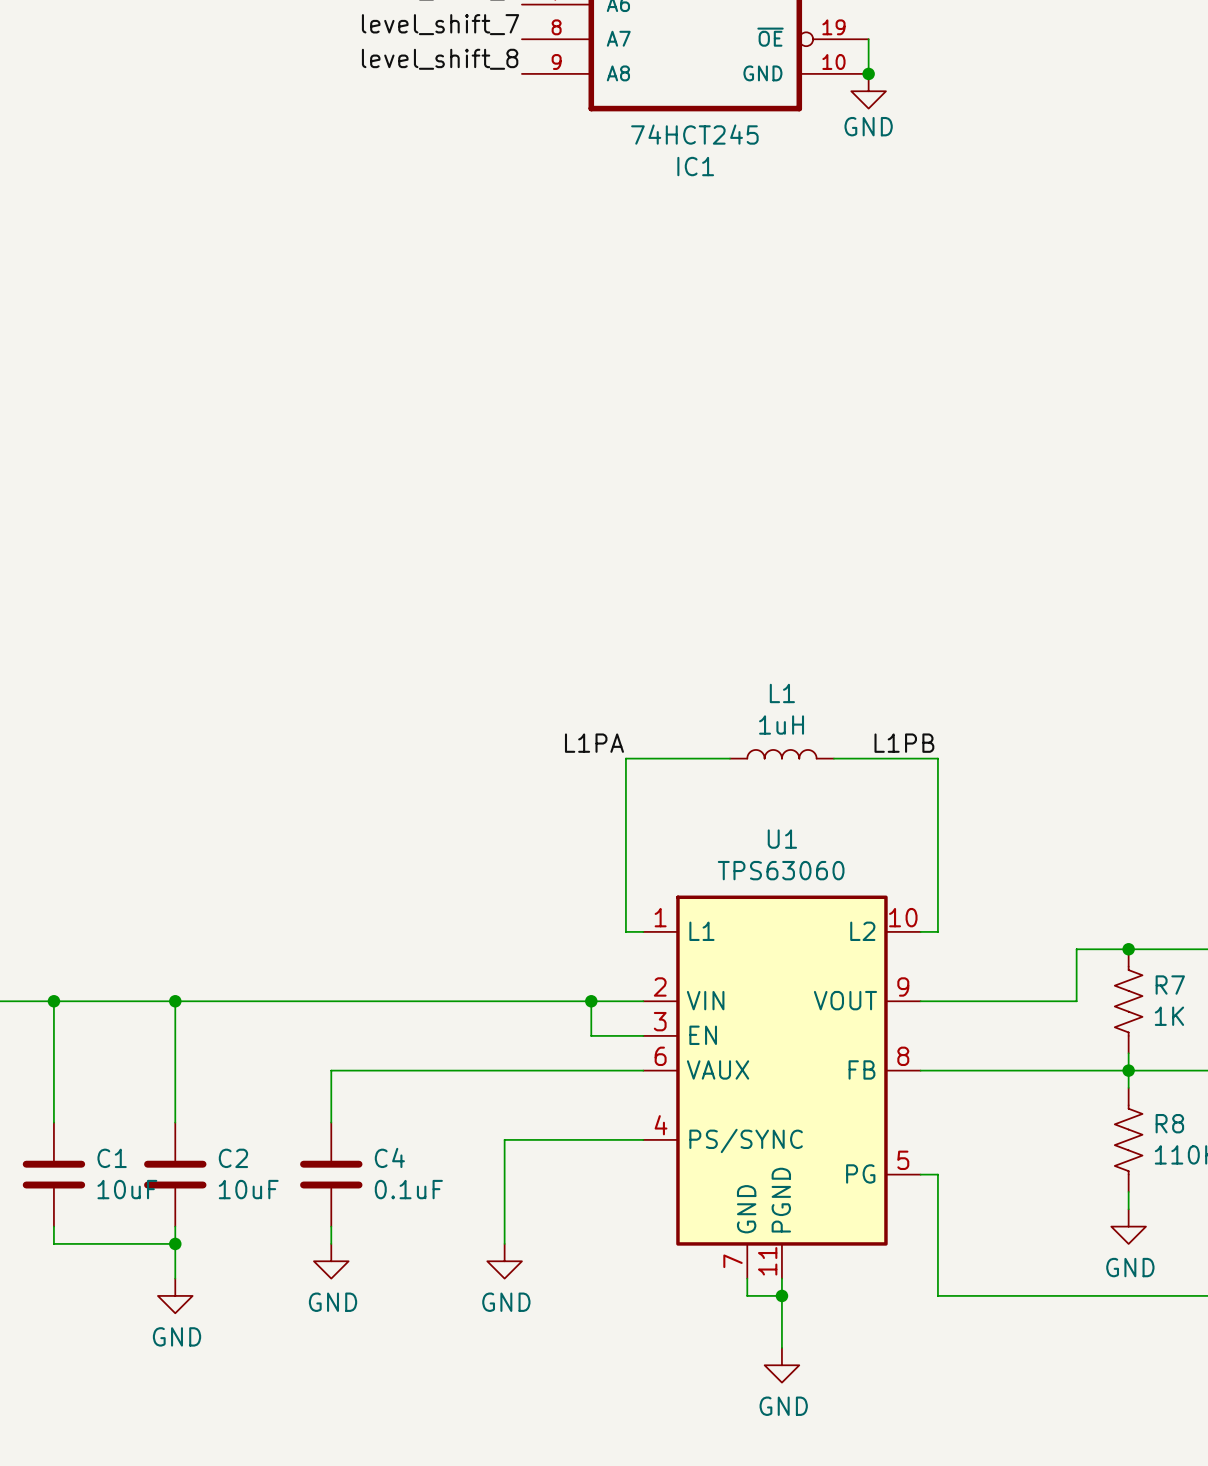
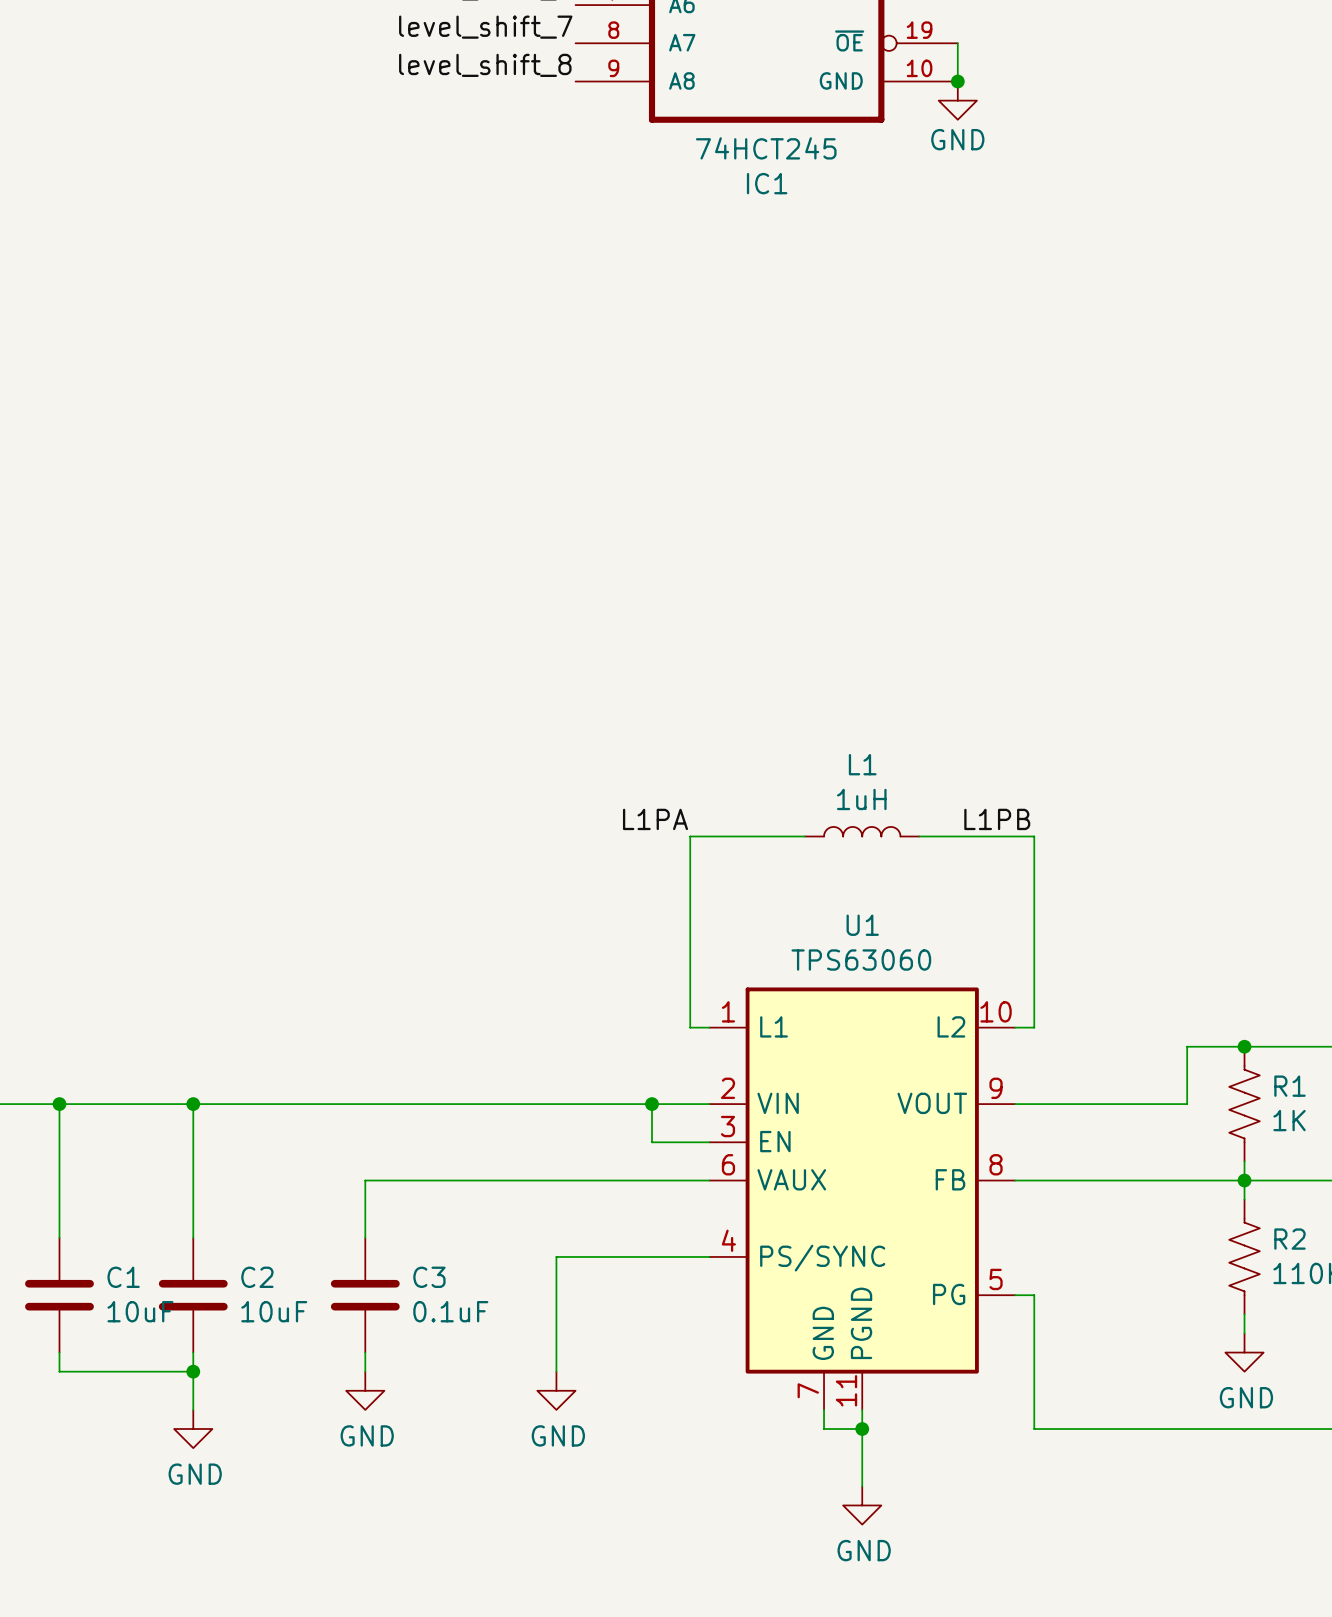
R7 name: R7 (1170, 985) -> R1 (1289, 1086)
R8 name: R8 (1169, 1123) -> R2 (1289, 1239)
C4 name: C4 (389, 1157) -> C3 (429, 1277)

